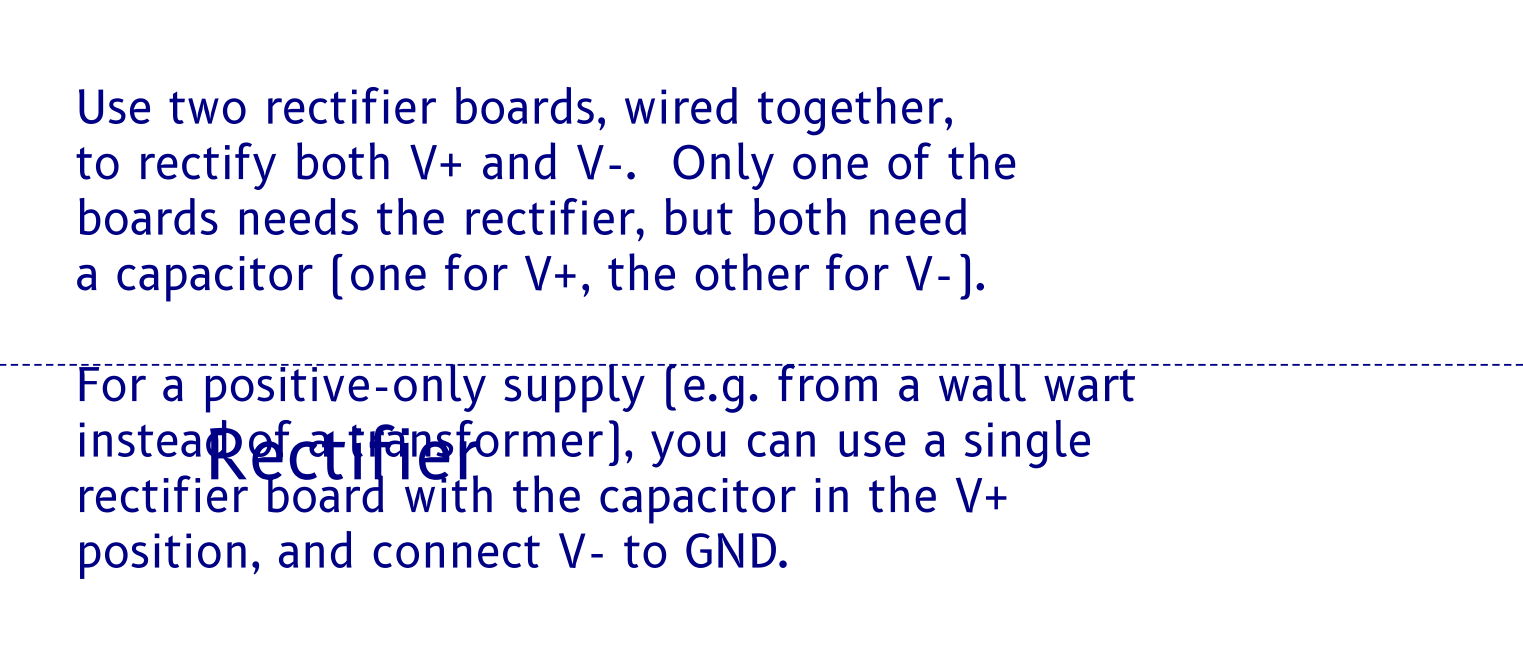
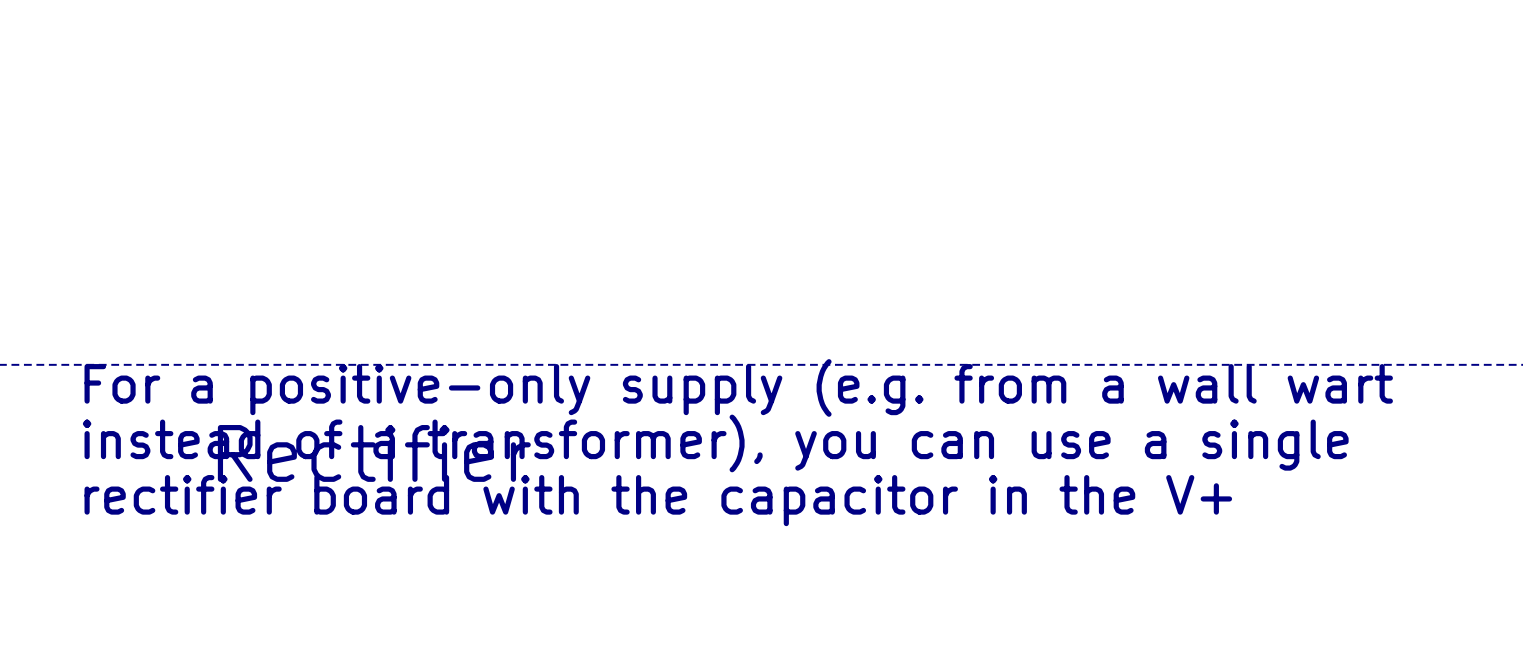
text: Use two rectifier boards, wired together, (515, 111) -> none
text: to rectify both V+ and V-. Only one of the (545, 166) -> none
text: boards needs the rectifier, but both need (522, 219) -> none
text: a capacitor (one for V+, the other for V-). (530, 277) -> none
text: position, and connect V- to GND. (433, 554) -> none

